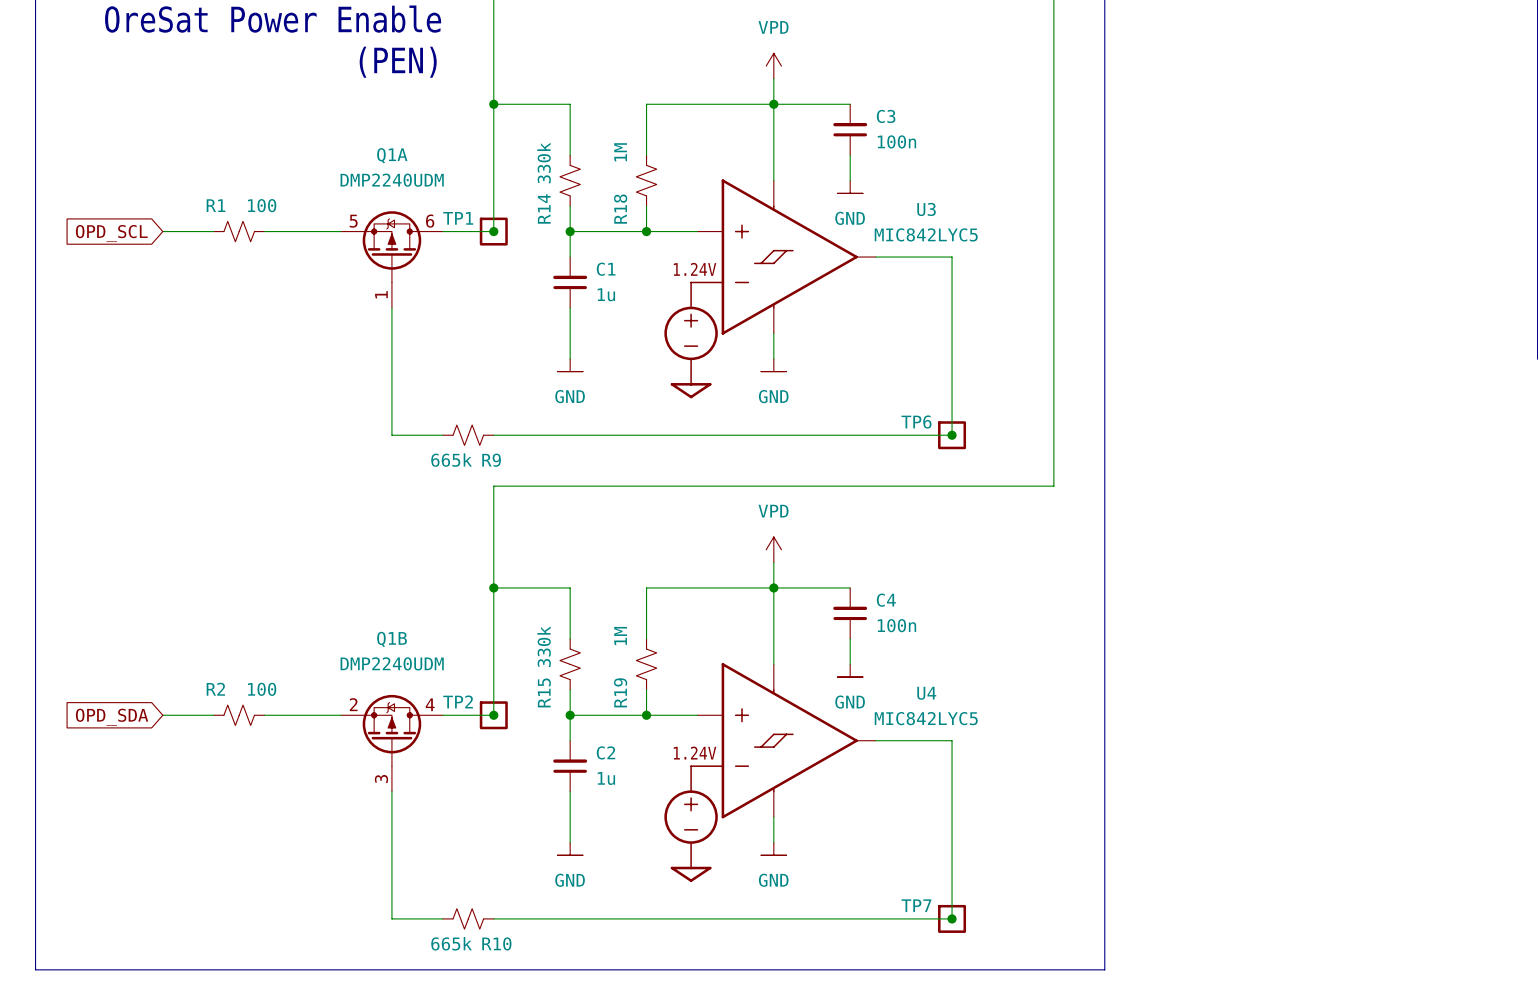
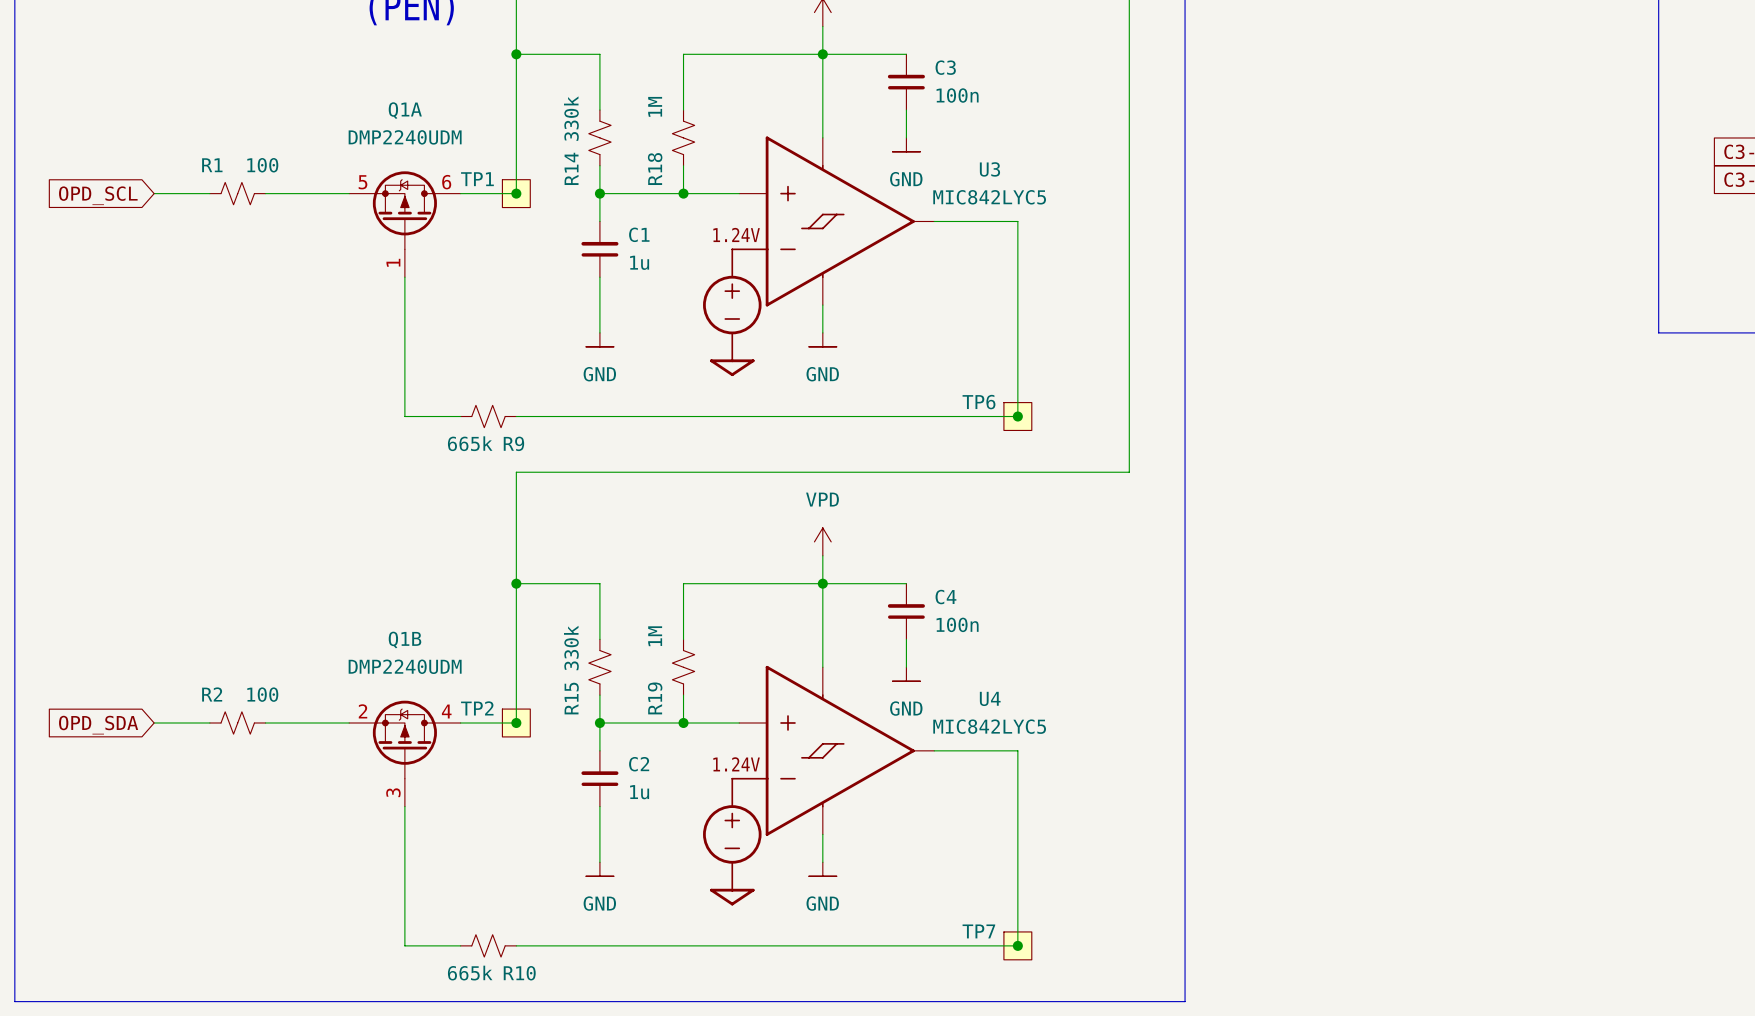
TP1 symbol: [479, 217, 508, 246] -> [502, 179, 531, 208]
TP6 symbol: [938, 421, 967, 450] -> [1003, 402, 1032, 431]
TP2 symbol: [479, 701, 508, 730] -> [502, 709, 531, 737]
TP7 symbol: [938, 904, 967, 933] -> [1003, 931, 1032, 960]

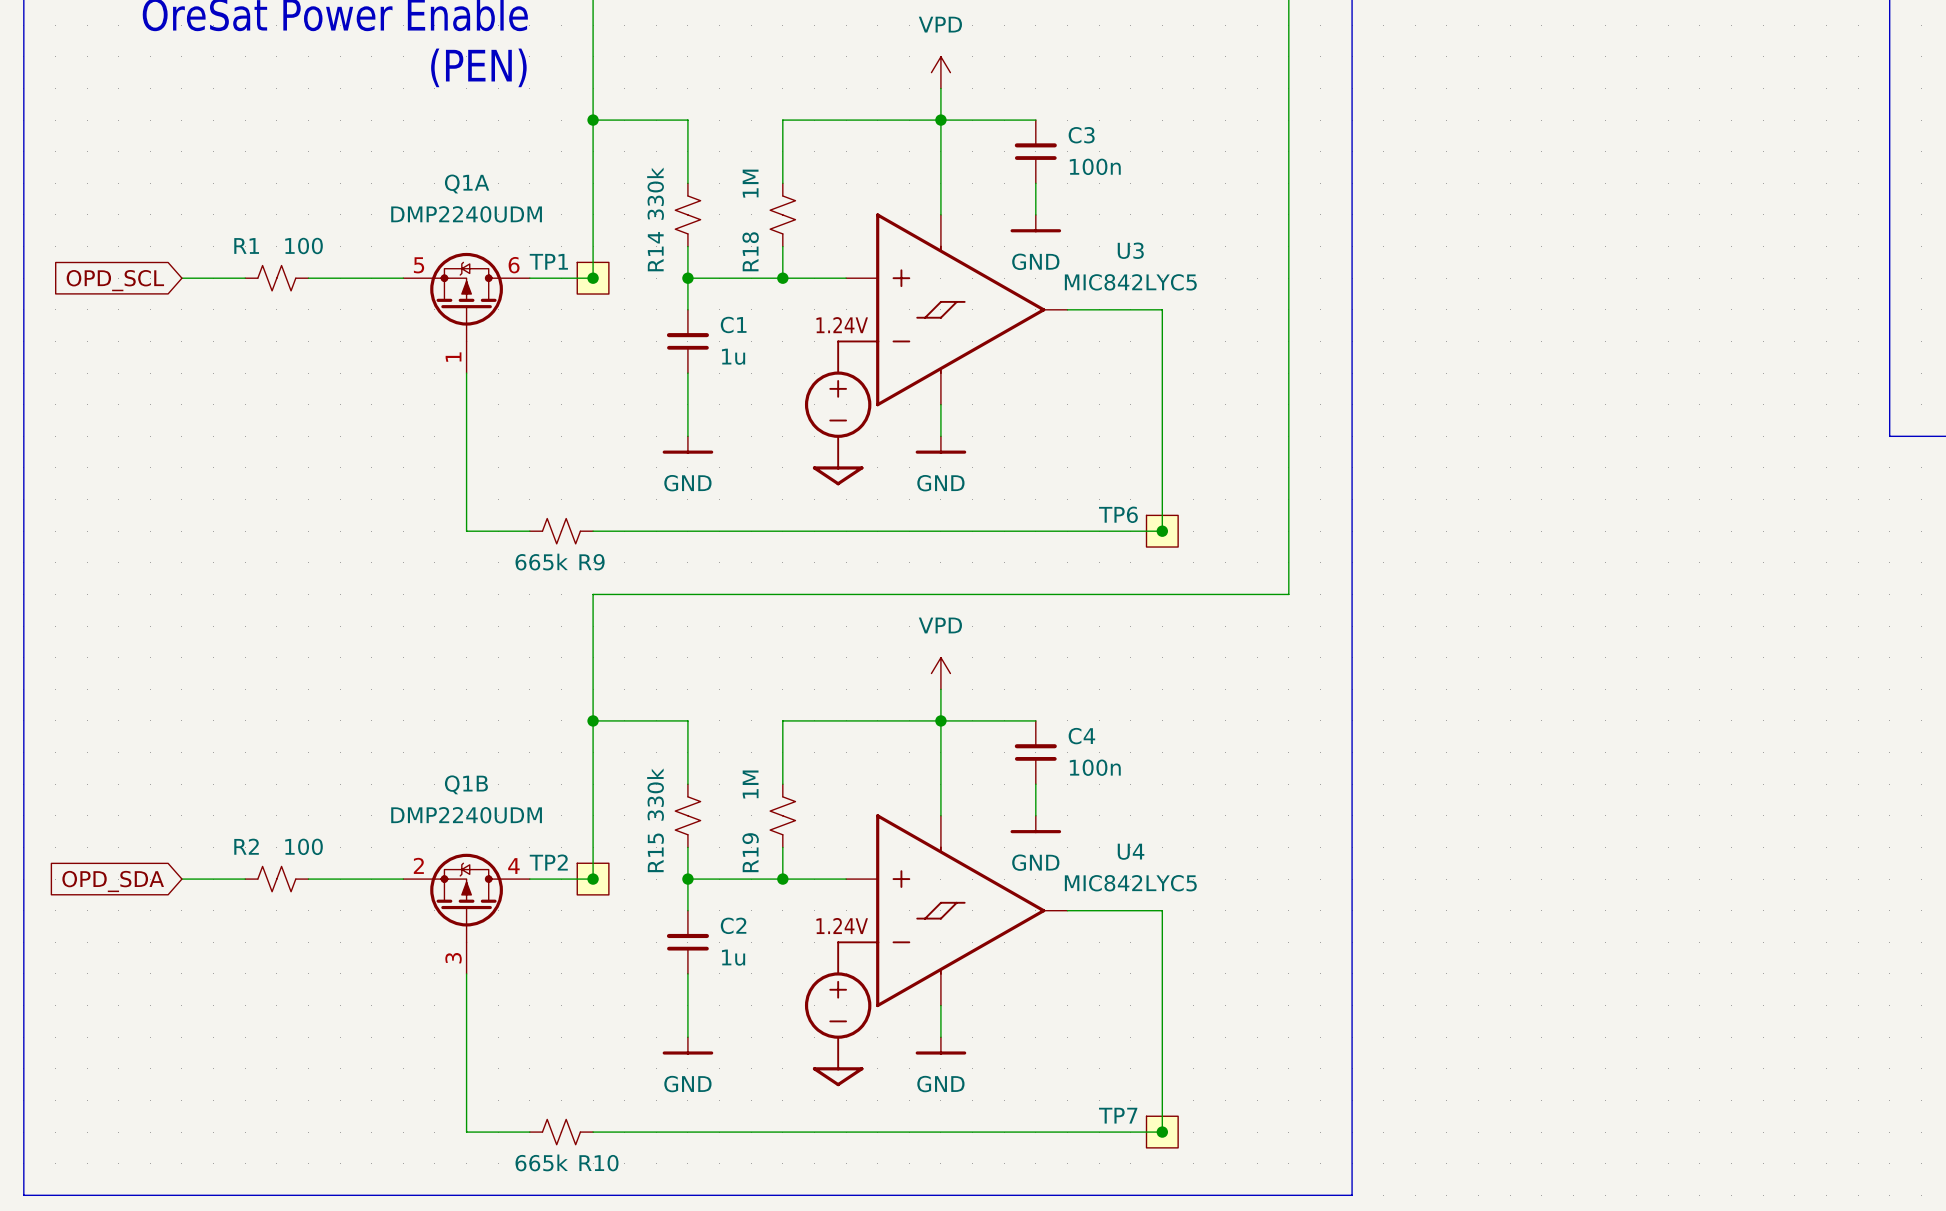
power symbol shape: [892, 137, 921, 152] -> [1010, 214, 1062, 233]
power symbol shape: [586, 332, 614, 347] -> [662, 436, 714, 454]
power symbol shape: [808, 332, 837, 347] -> [915, 436, 967, 454]
power symbol shape: [892, 667, 921, 682] -> [1010, 815, 1062, 834]
power symbol shape: [586, 862, 614, 877] -> [662, 1037, 714, 1055]
power symbol shape: [808, 862, 837, 877] -> [915, 1037, 967, 1055]

